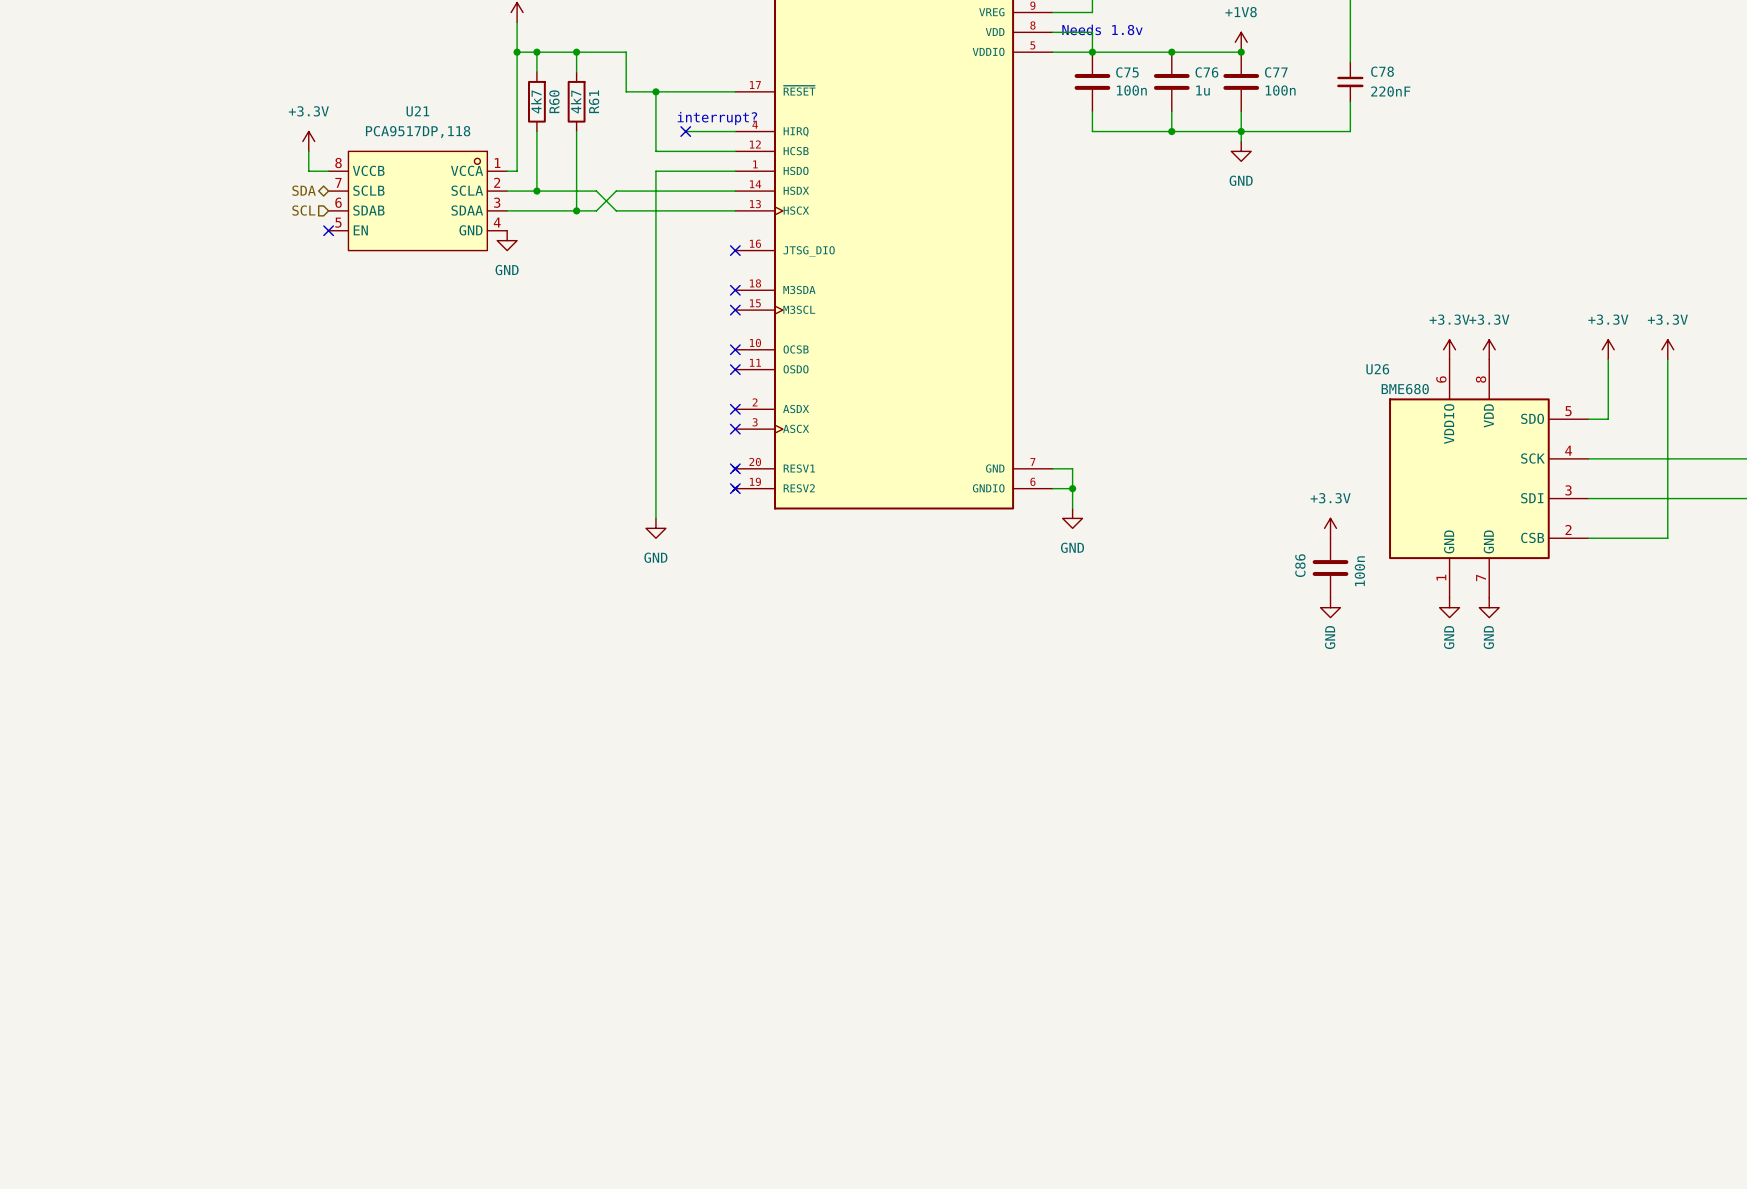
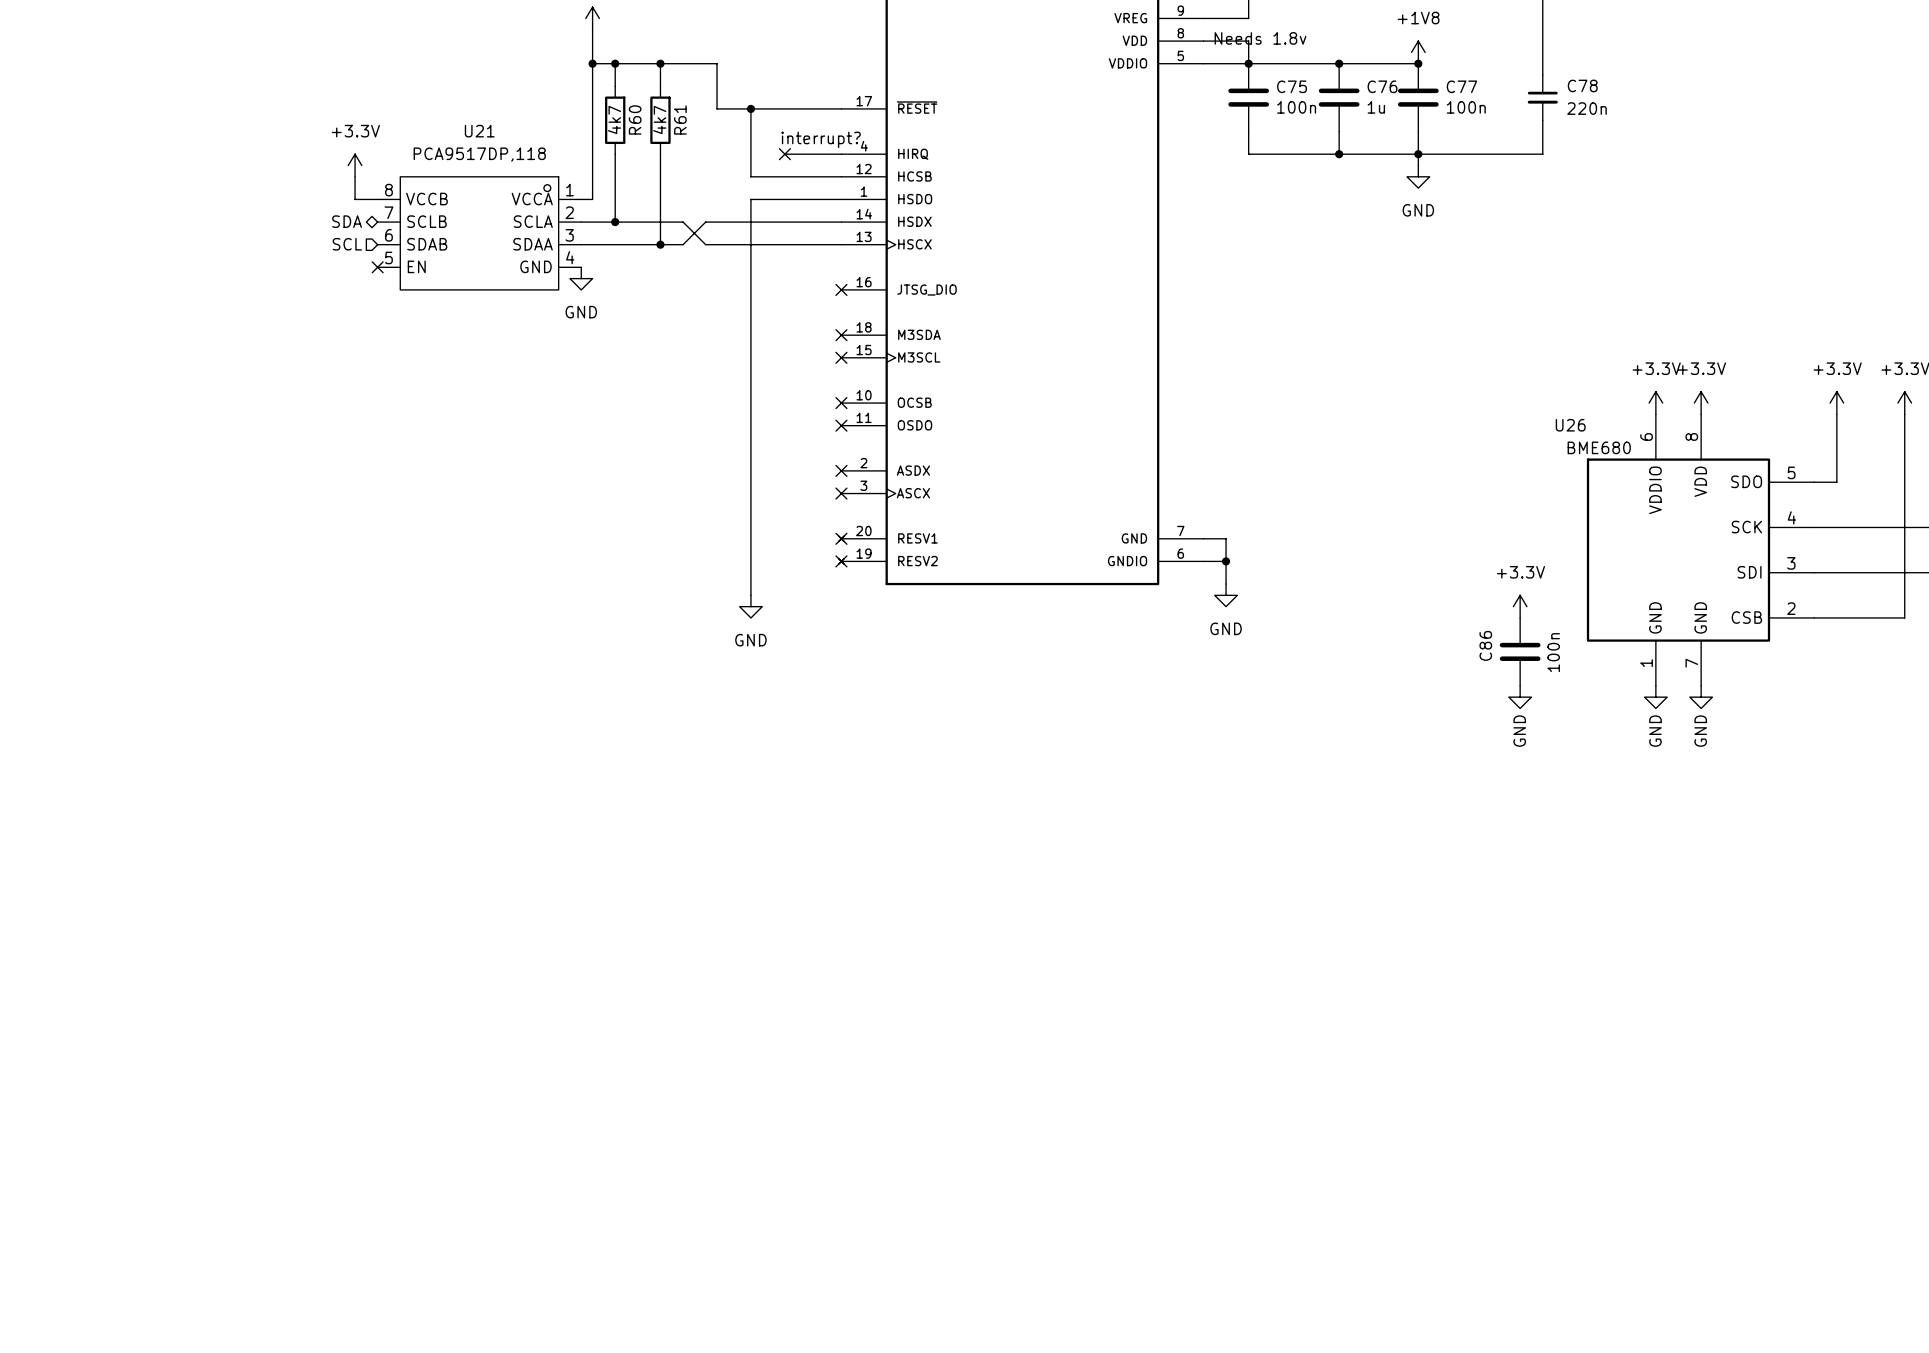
C78 value: 220nF (1390, 91) -> 220n (1587, 108)

